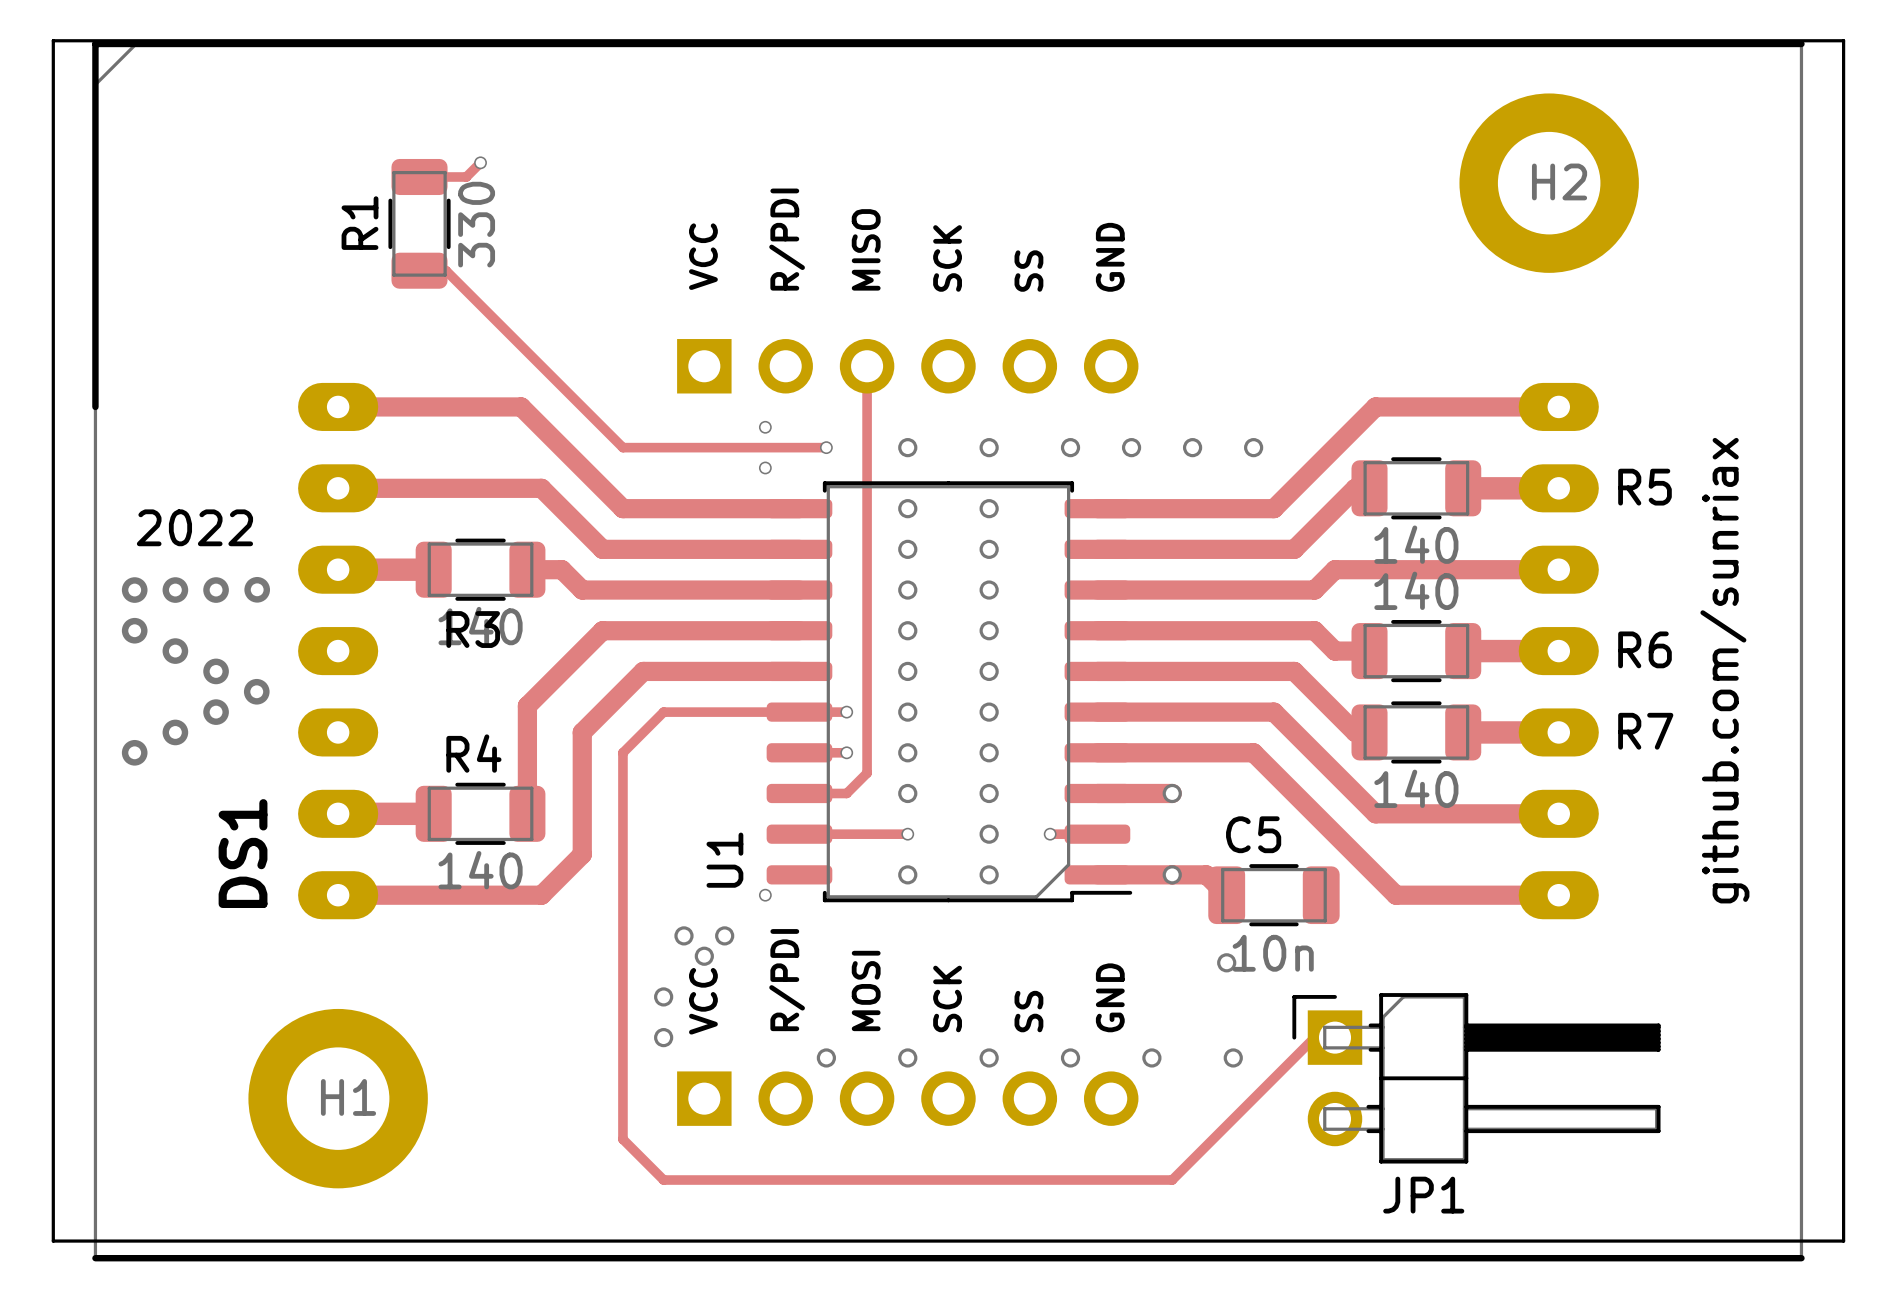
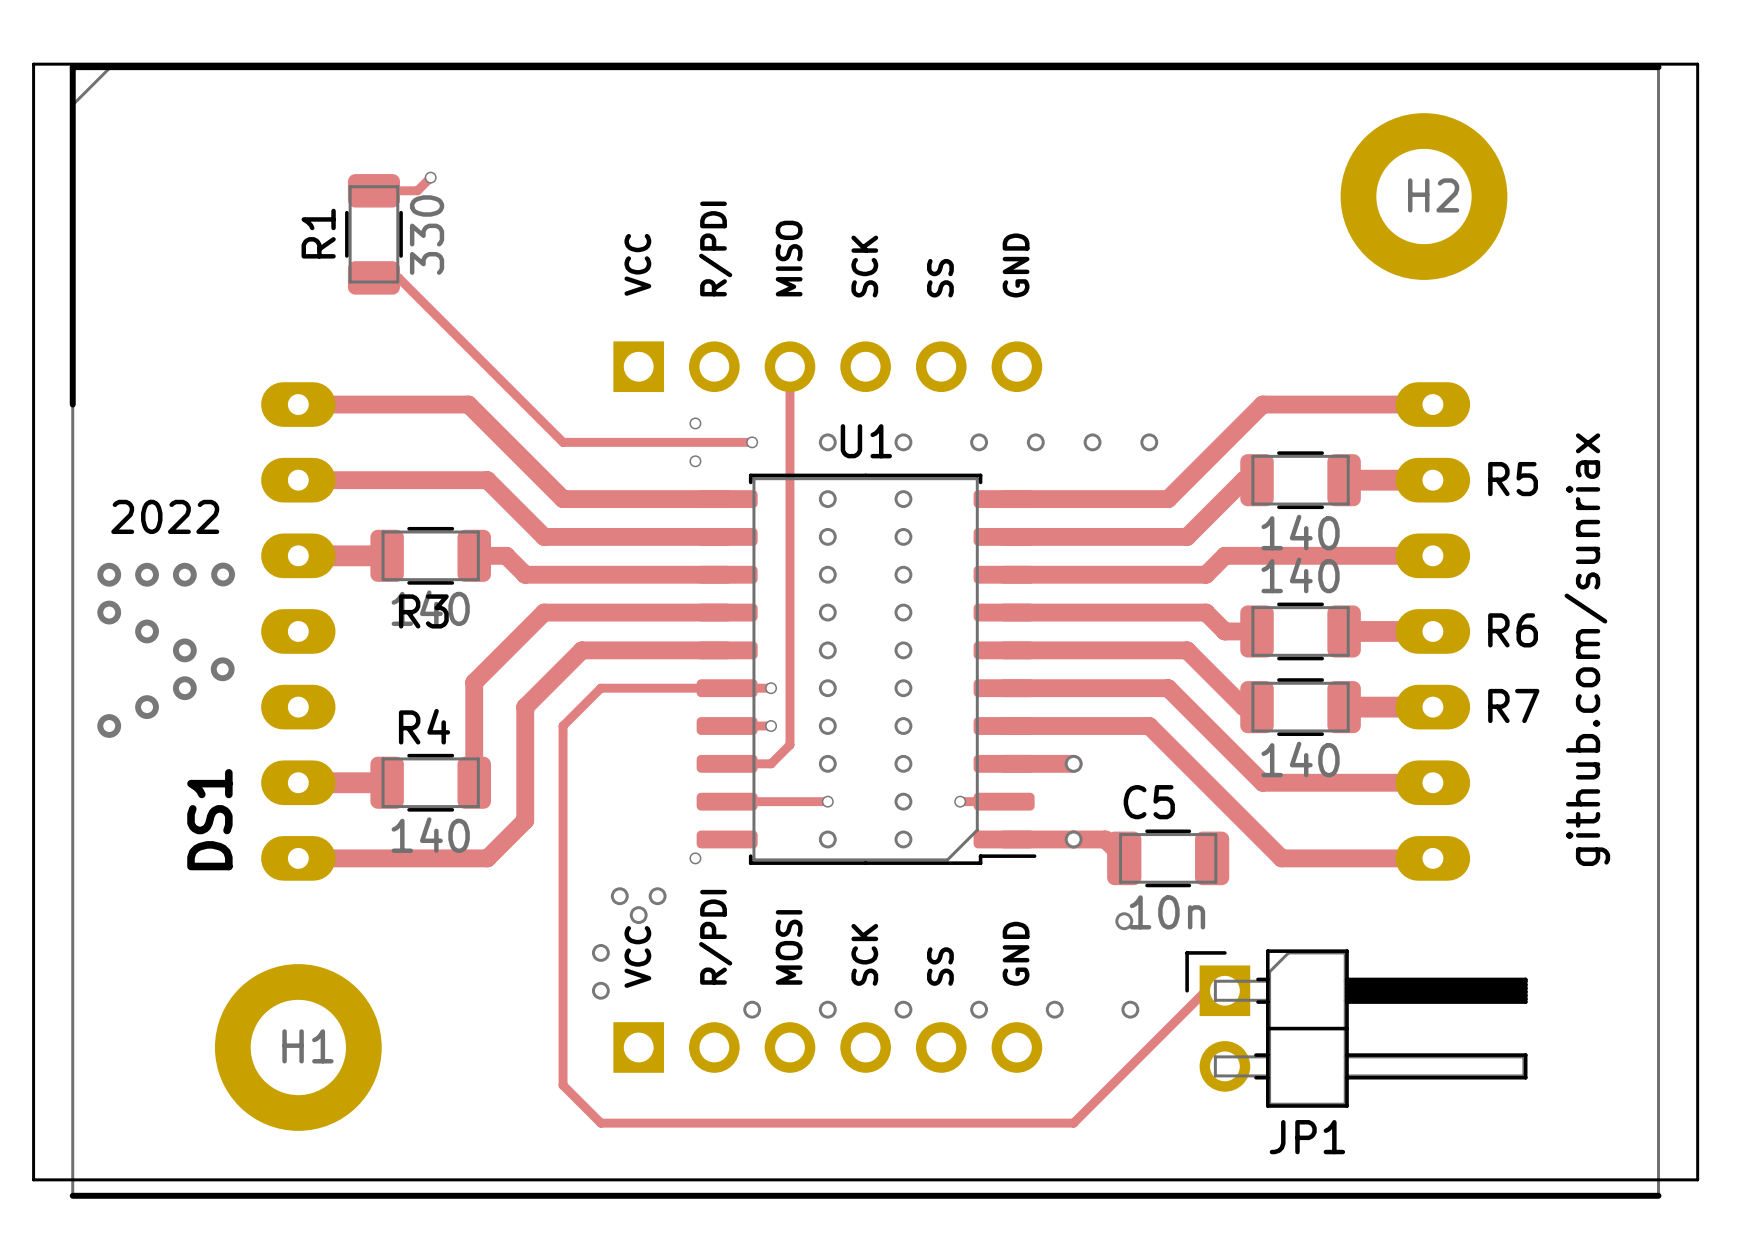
U1 name rotation: 0° (724, 860) -> 90° clockwise (866, 441)
U1 name position: U1 (724, 860) -> U1 (866, 441)

